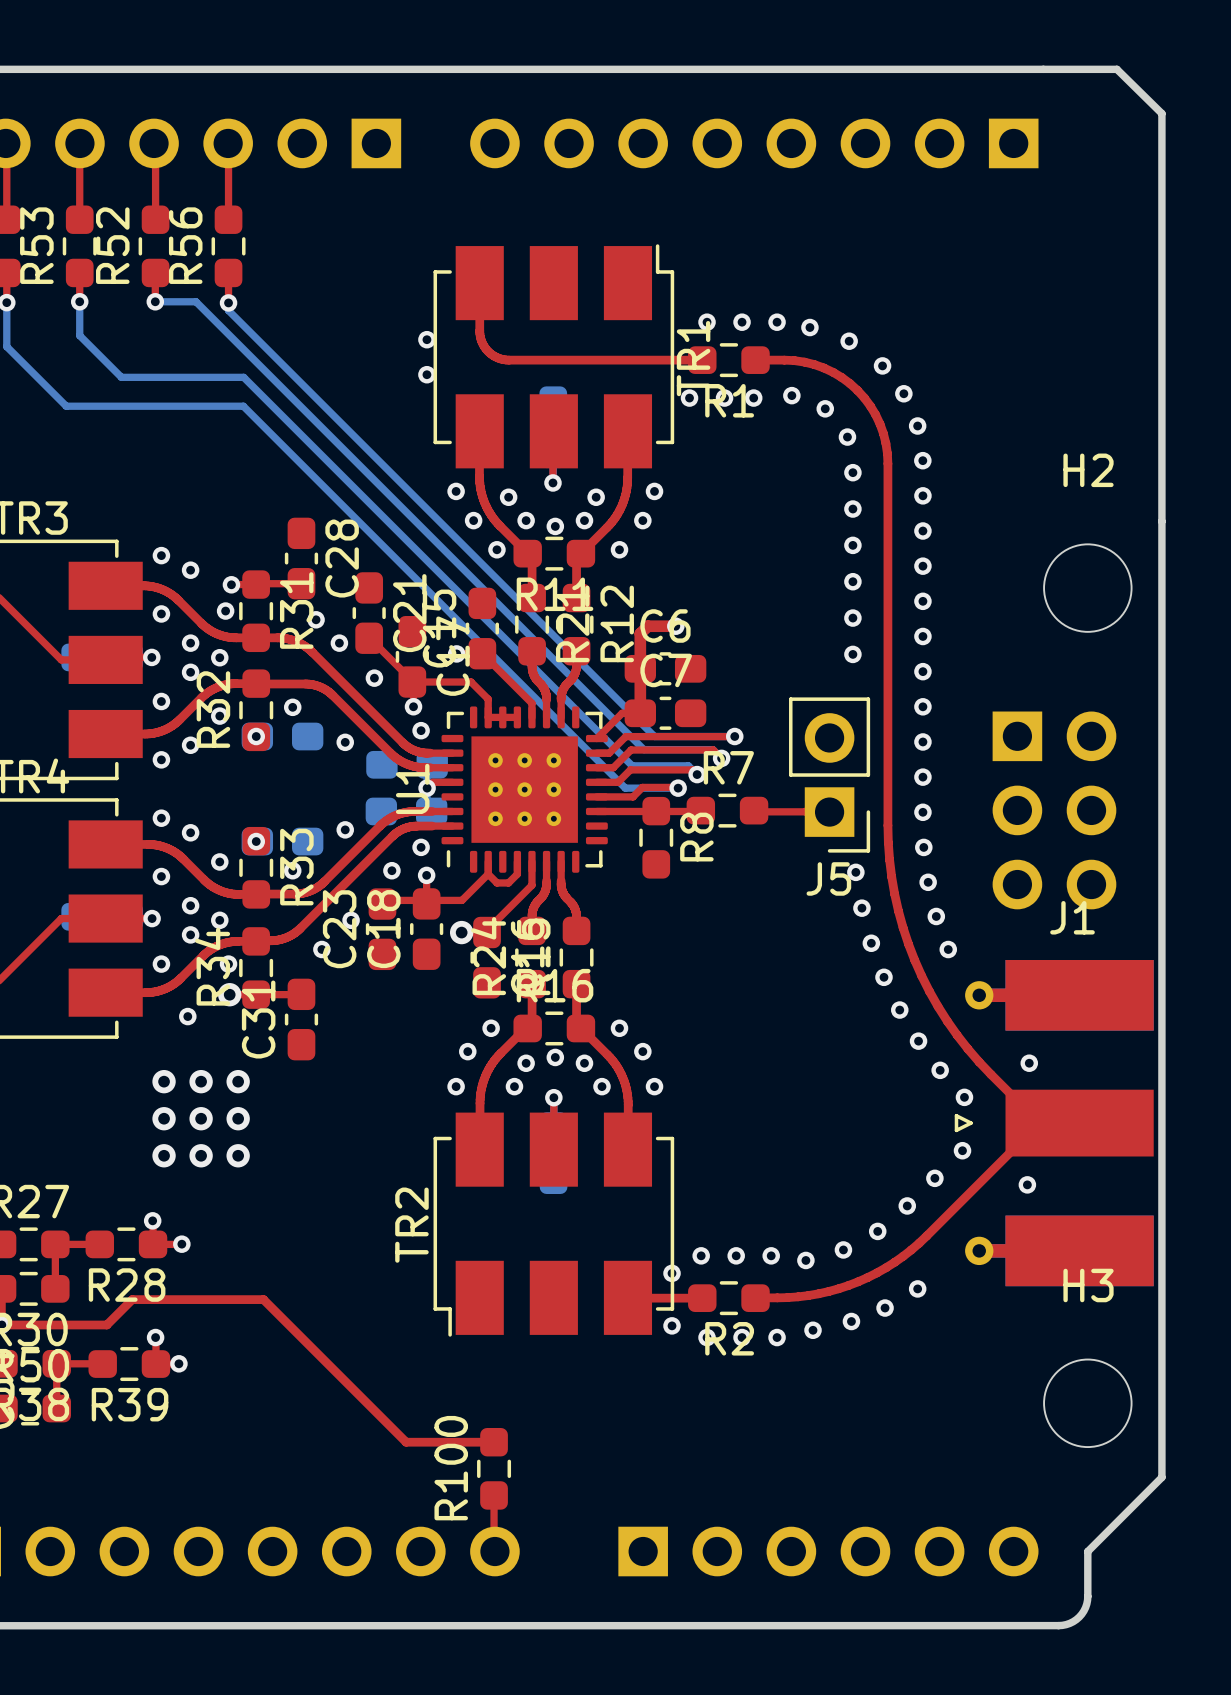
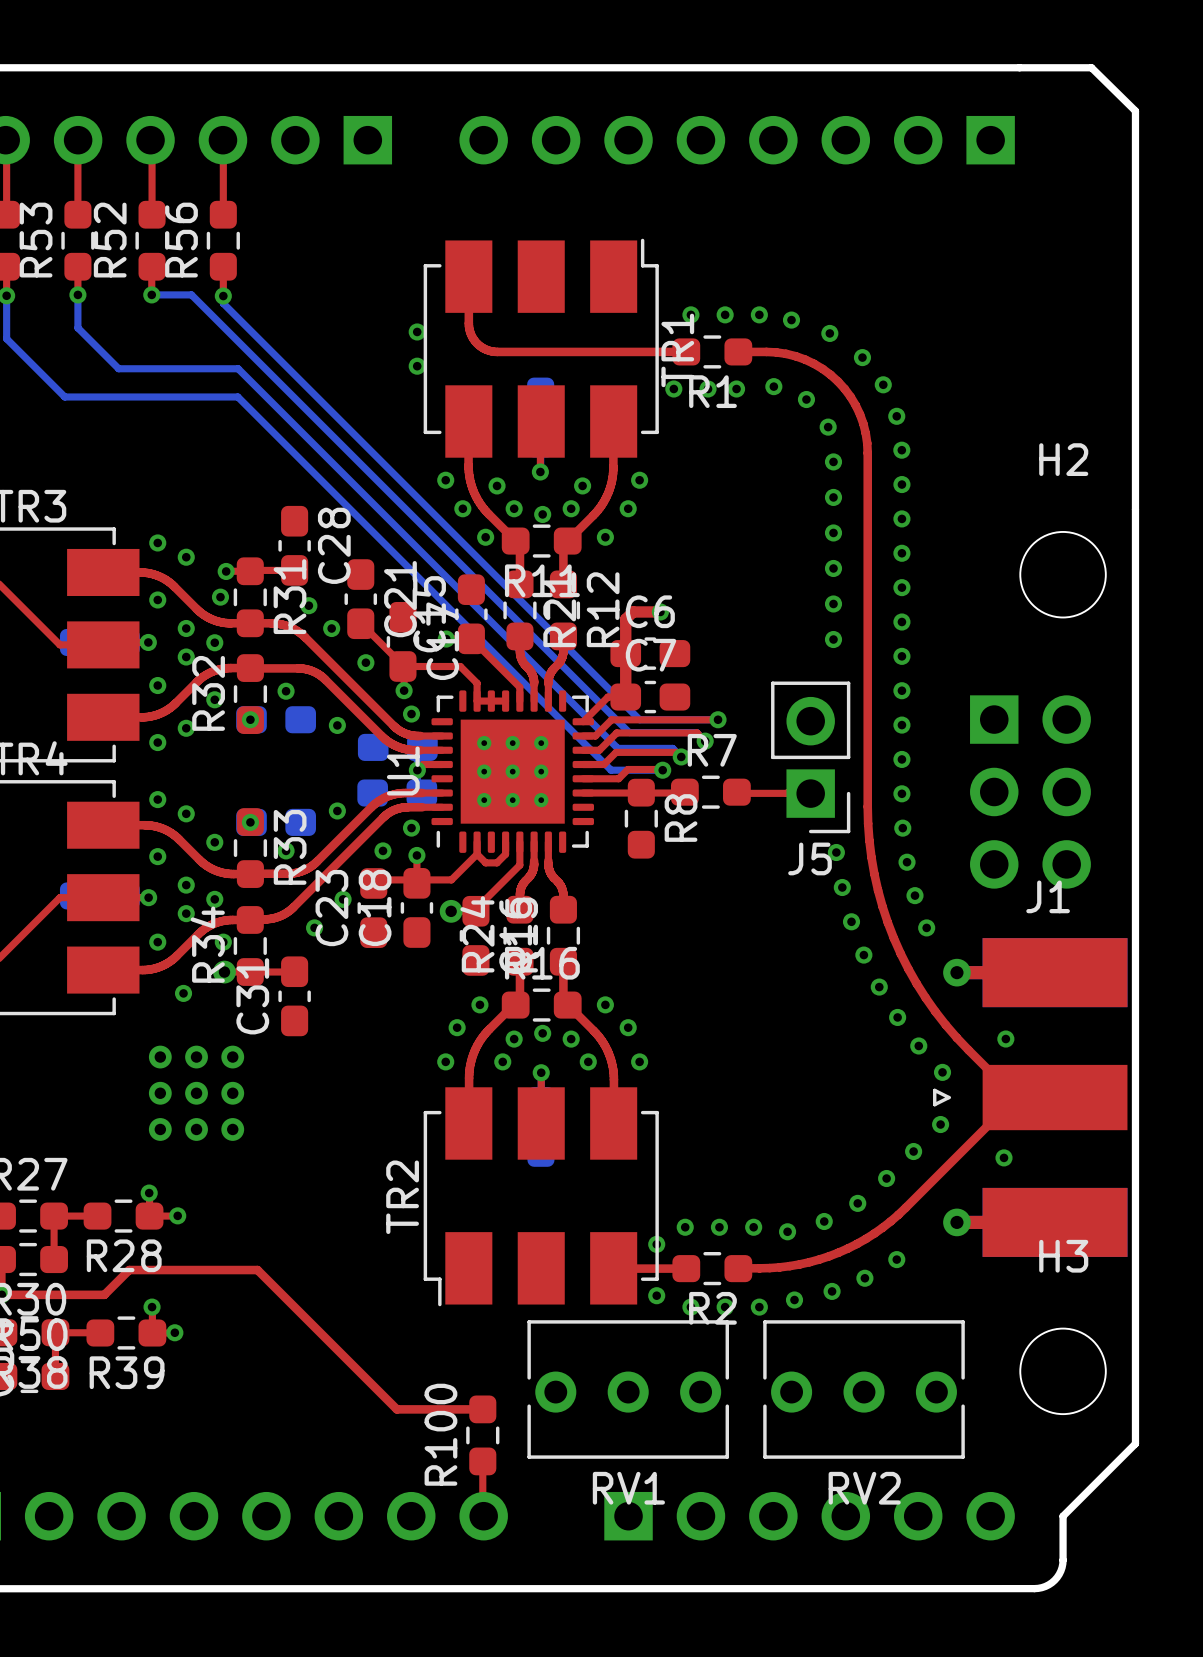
RV1: none -> (628, 1389)
RV2: none -> (864, 1389)

